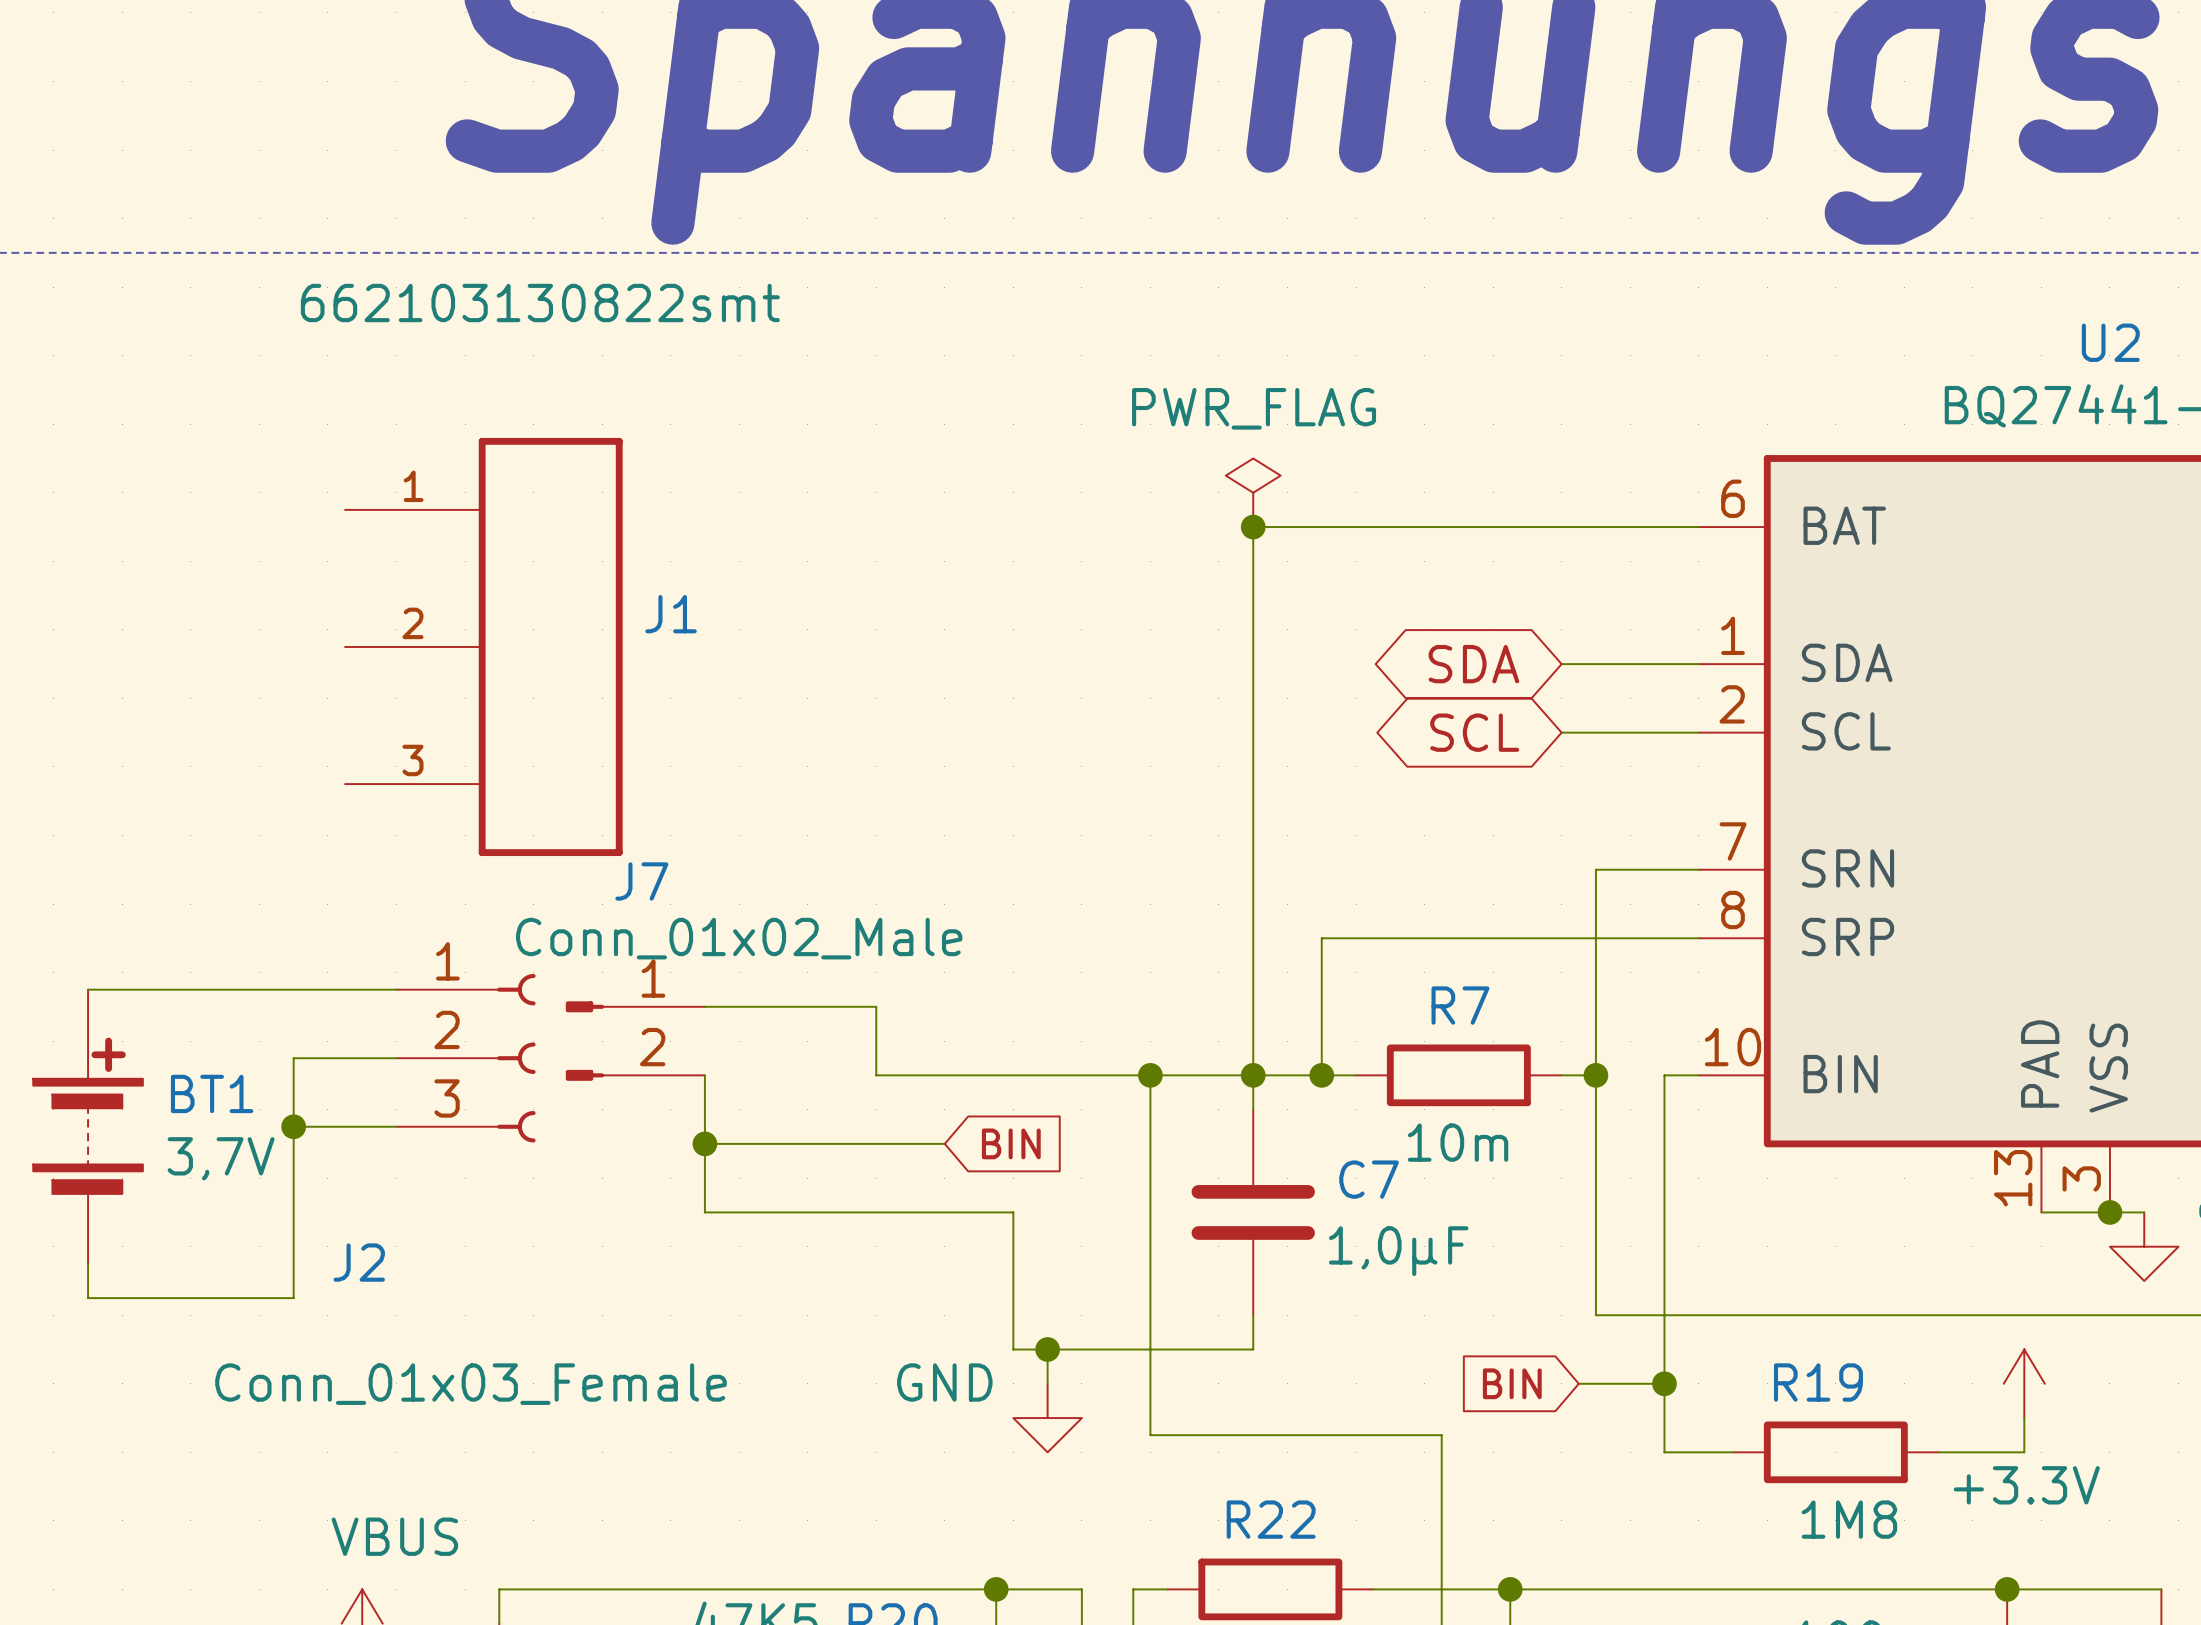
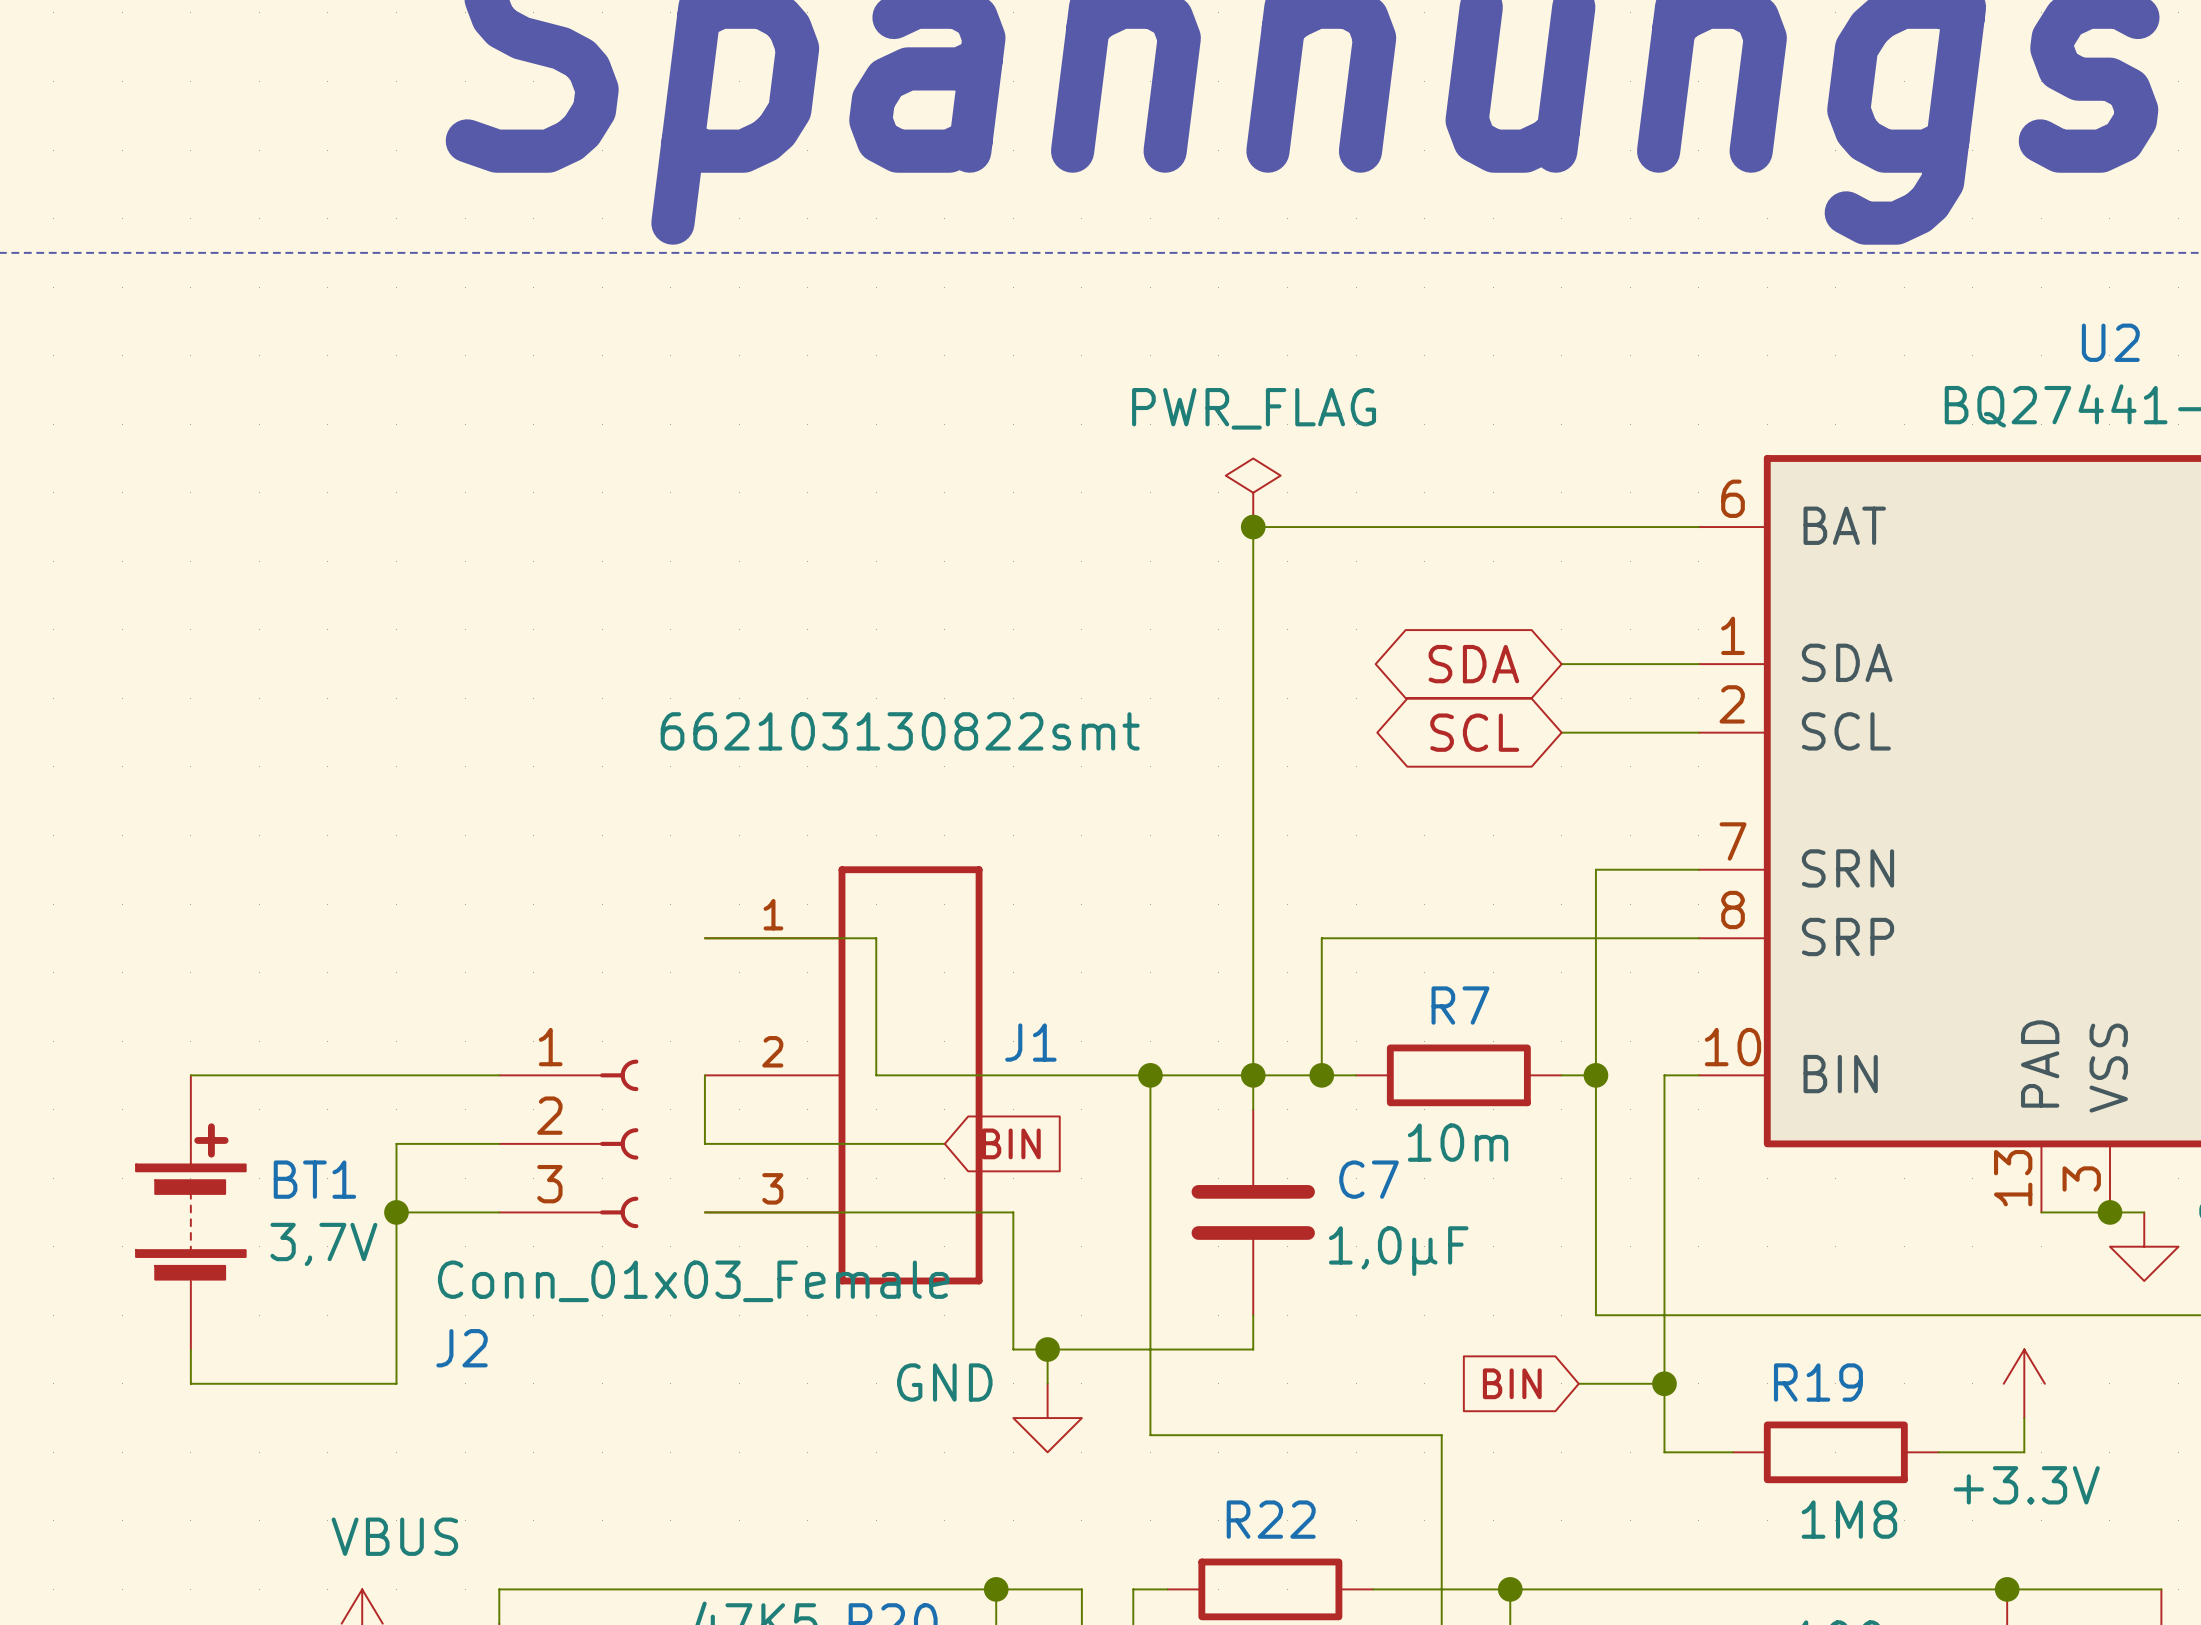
J1 position: (483, 646) -> (843, 1075)
wire: (88, 989) (396, 989) -> (190, 1075) (499, 1075)
wire: (704, 1006) (876, 1006) -> (704, 938) (876, 938) (876, 1006)
J7: Conn_01x02_Male (635, 1041) -> none
wire: (396, 1058) (293, 1058) (293, 1298) (88, 1298) (88, 1263) -> (499, 1143) (396, 1143) (396, 1383) (190, 1383) (190, 1349)
J2 position: (466, 1058) -> (568, 1143)
BT1 position: (88, 1126) -> (190, 1212)
wire: (293, 1126) (396, 1126) -> (396, 1212) (499, 1212)
junction position: (293, 1126) -> (396, 1212)
wire: (704, 1143) (704, 1212) -> none
junction: (704, 1143) -> none
J2 value position: Conn_01x03_Female (470, 1384) -> Conn_01x03_Female (693, 1281)

